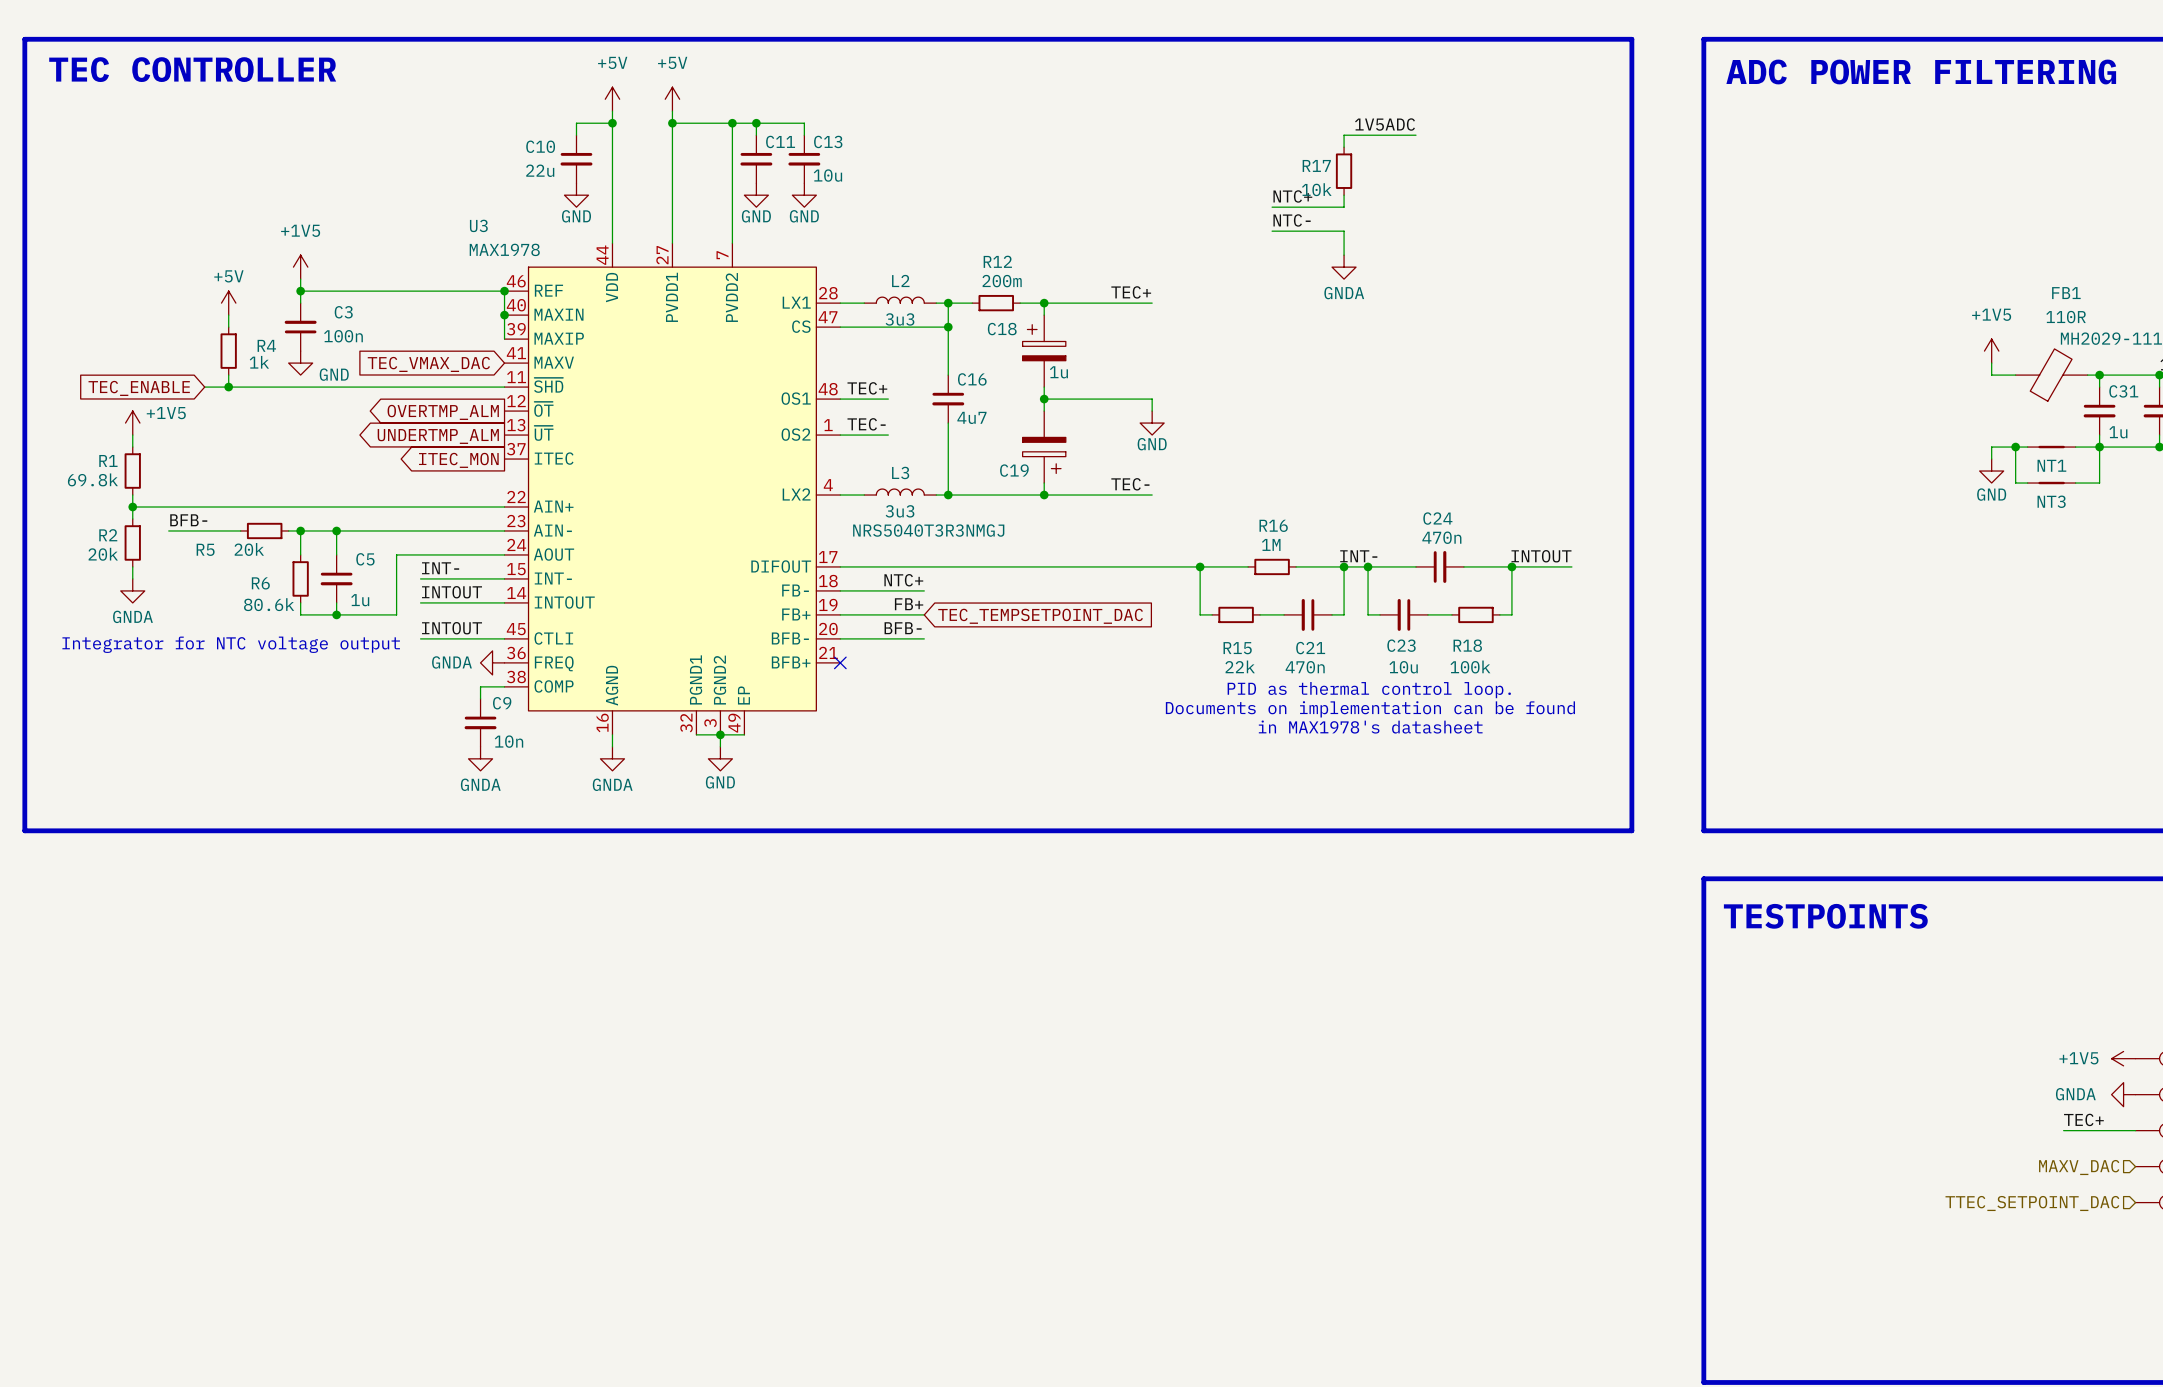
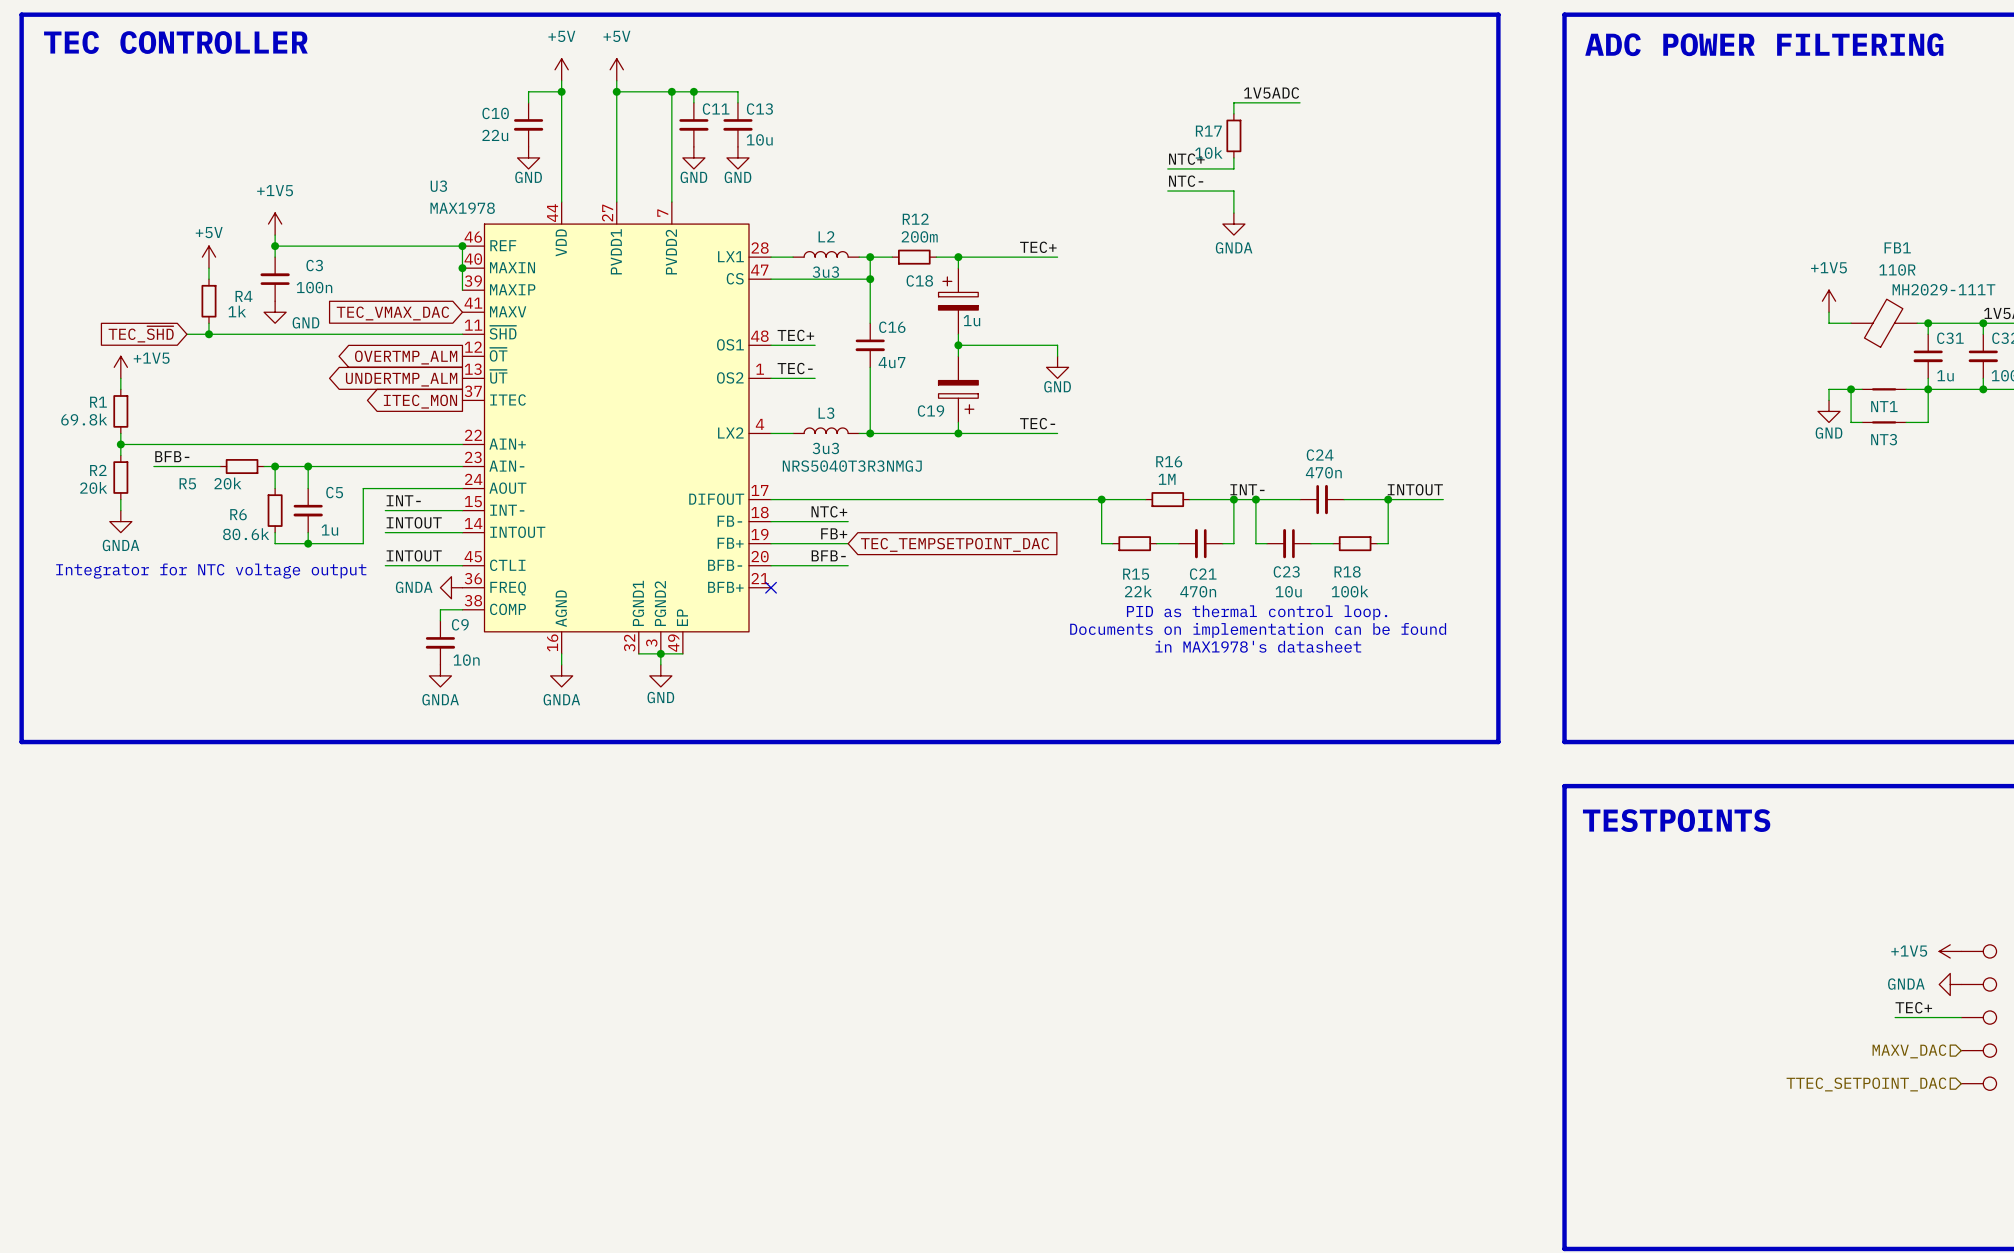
global label: TEC_ENABLE (139, 388) -> TEC_~{SHD} (141, 334)

